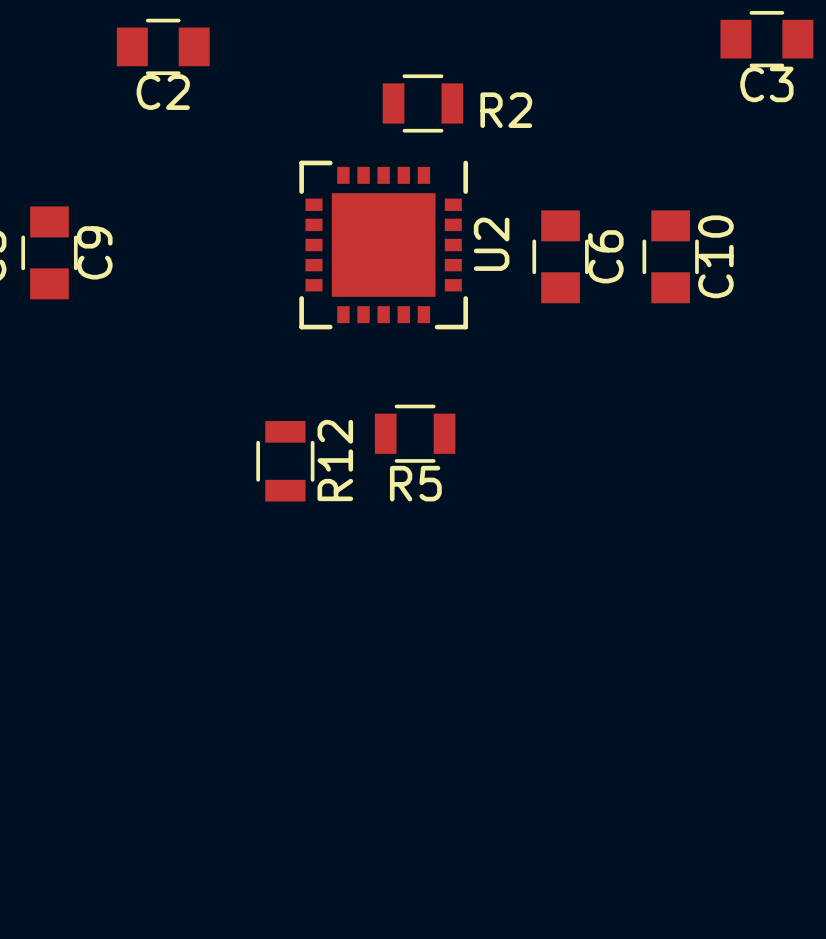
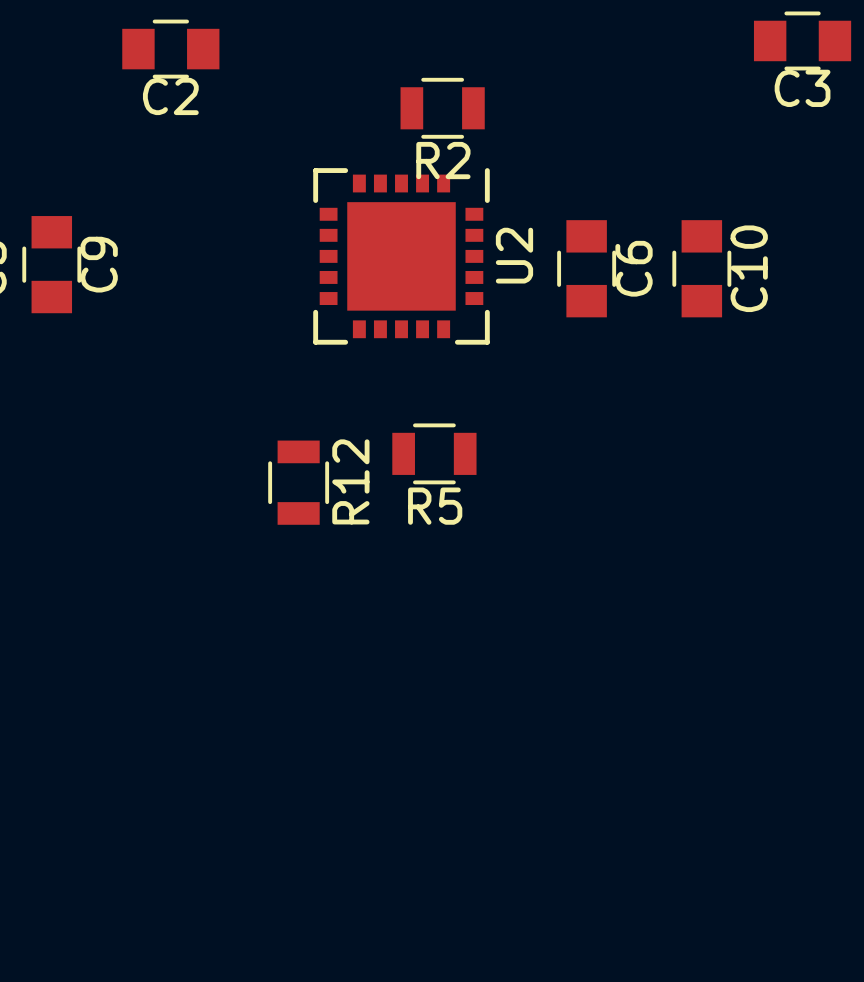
R2 name position: R2 (506, 110) -> R2 (443, 160)

